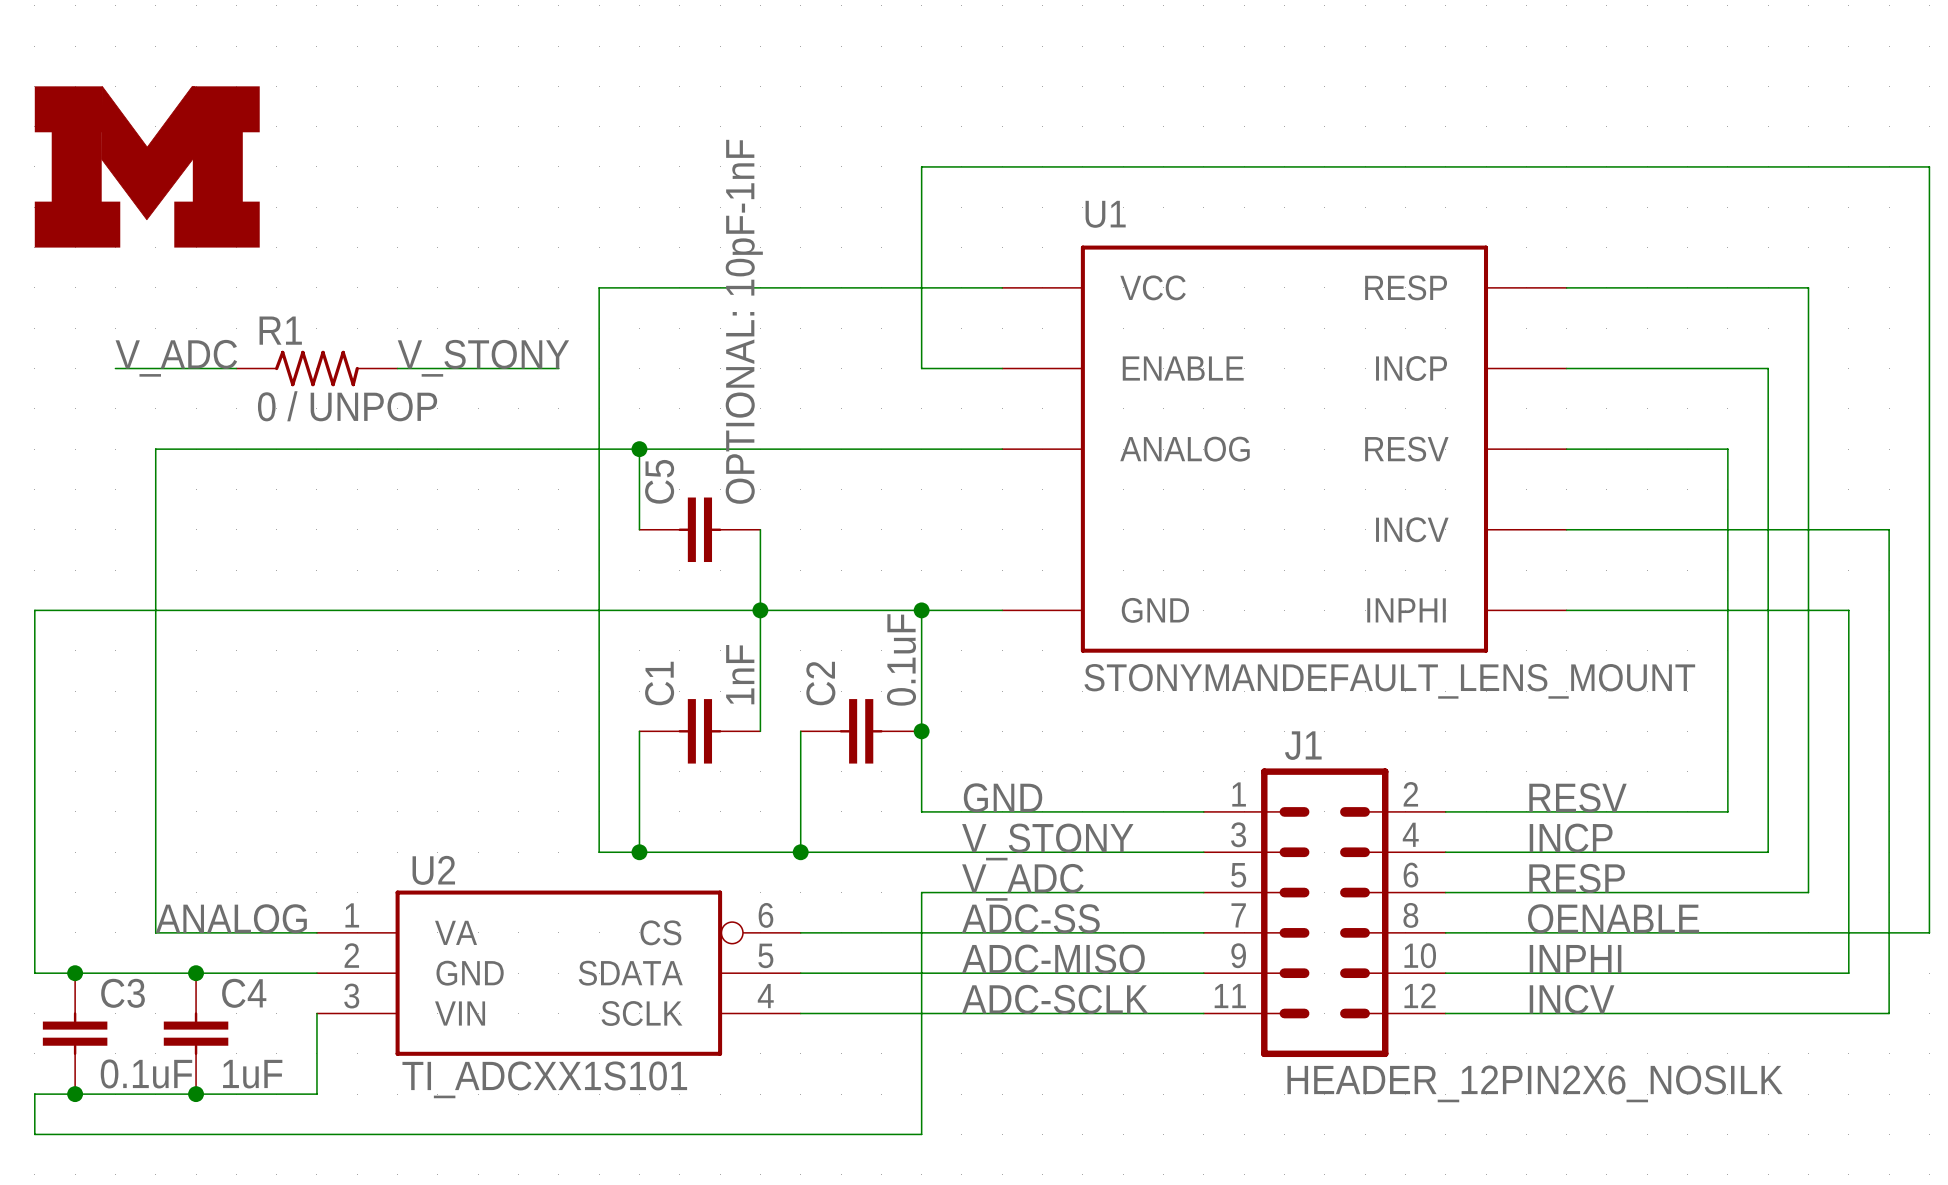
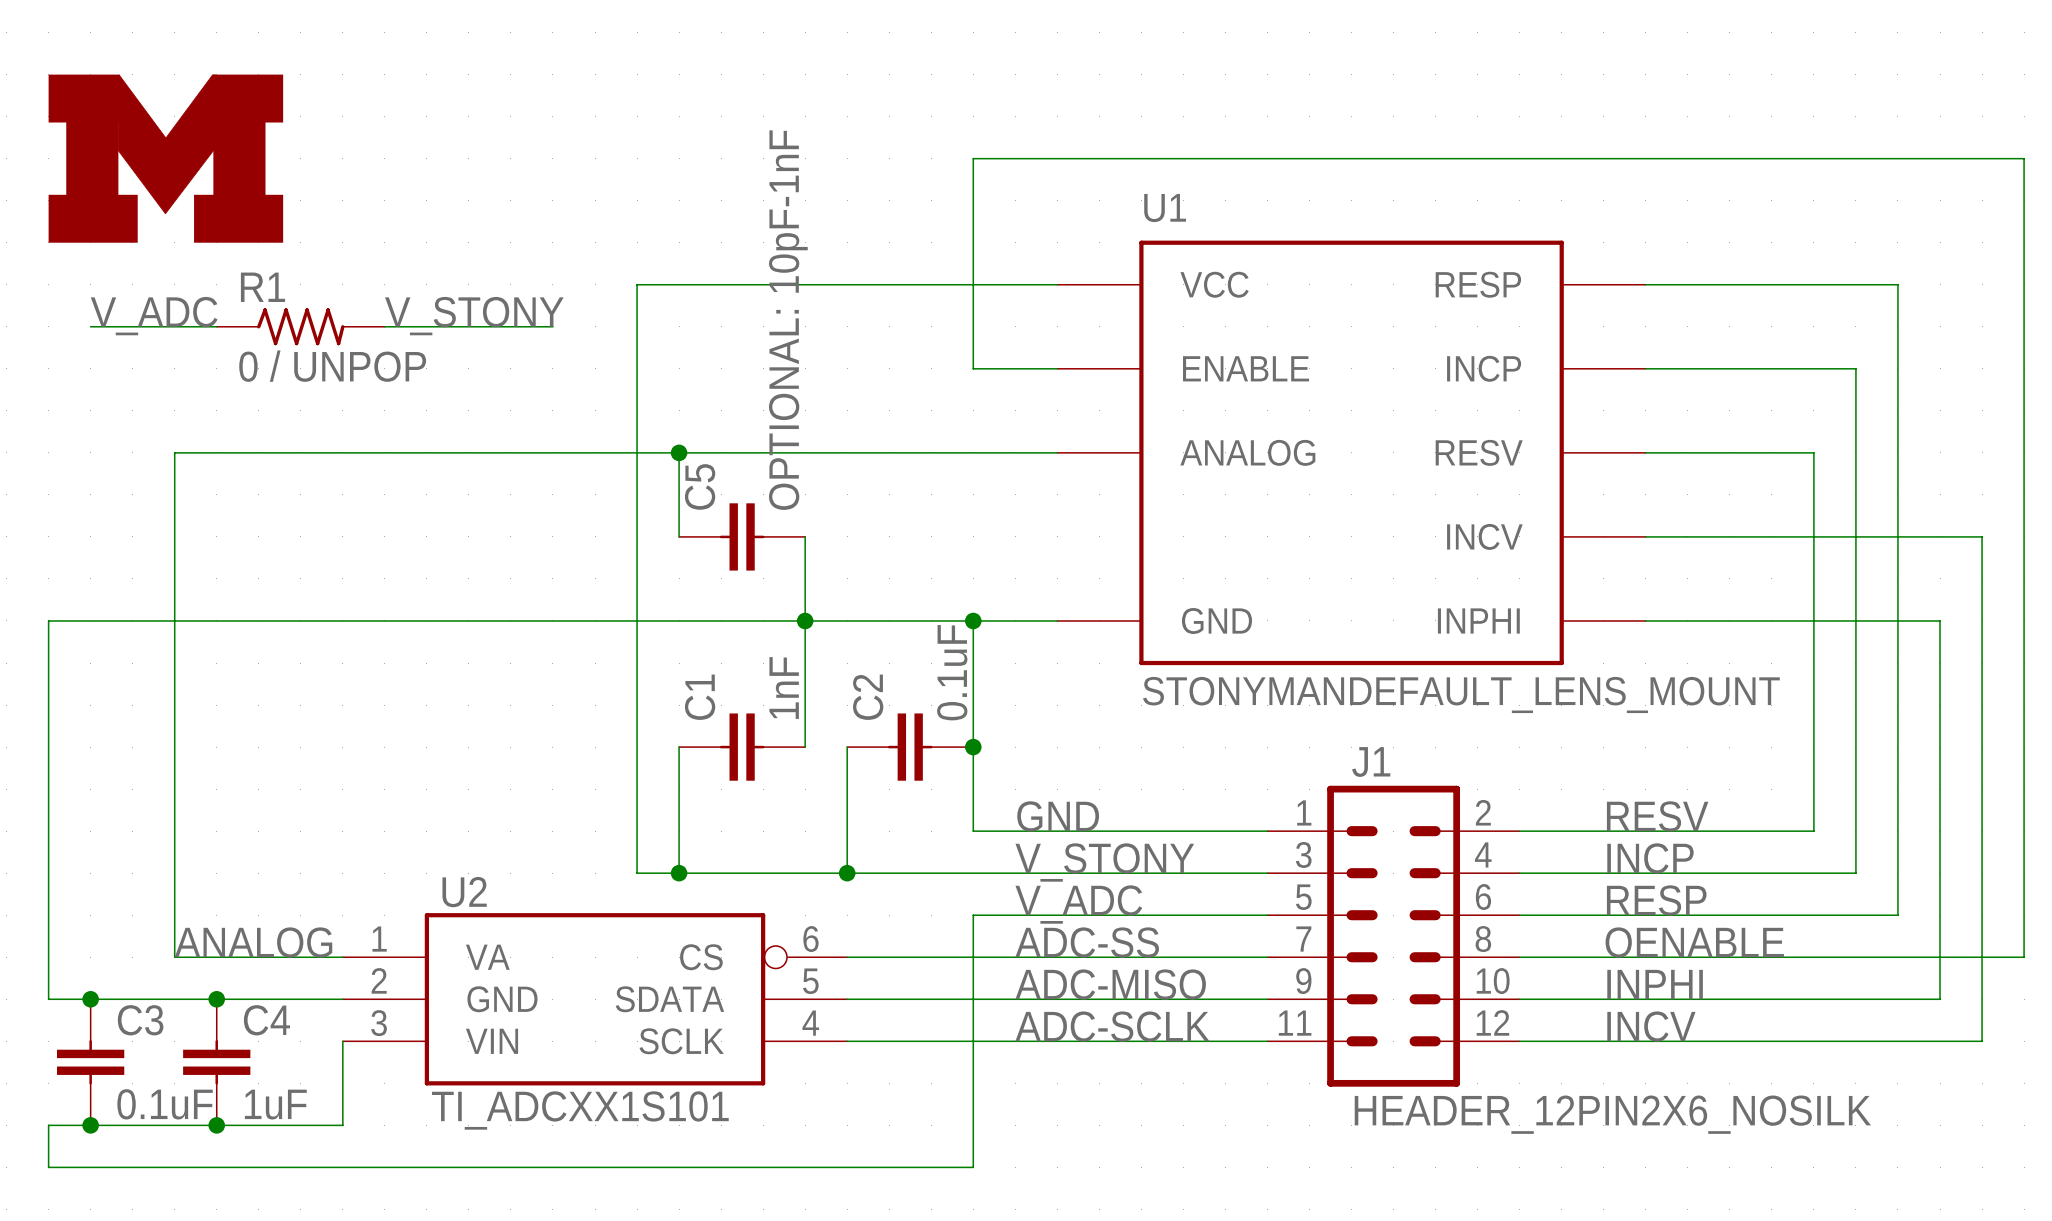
label position: V_ADC (176, 358) -> V_ADC (154, 316)
label position: V_STONY (483, 358) -> V_STONY (474, 316)
wire: (115, 368) (236, 368) -> (90, 326) (216, 326)
R1 position: (316, 368) -> (300, 326)
wire: (397, 368) (558, 368) -> (384, 326) (552, 326)

